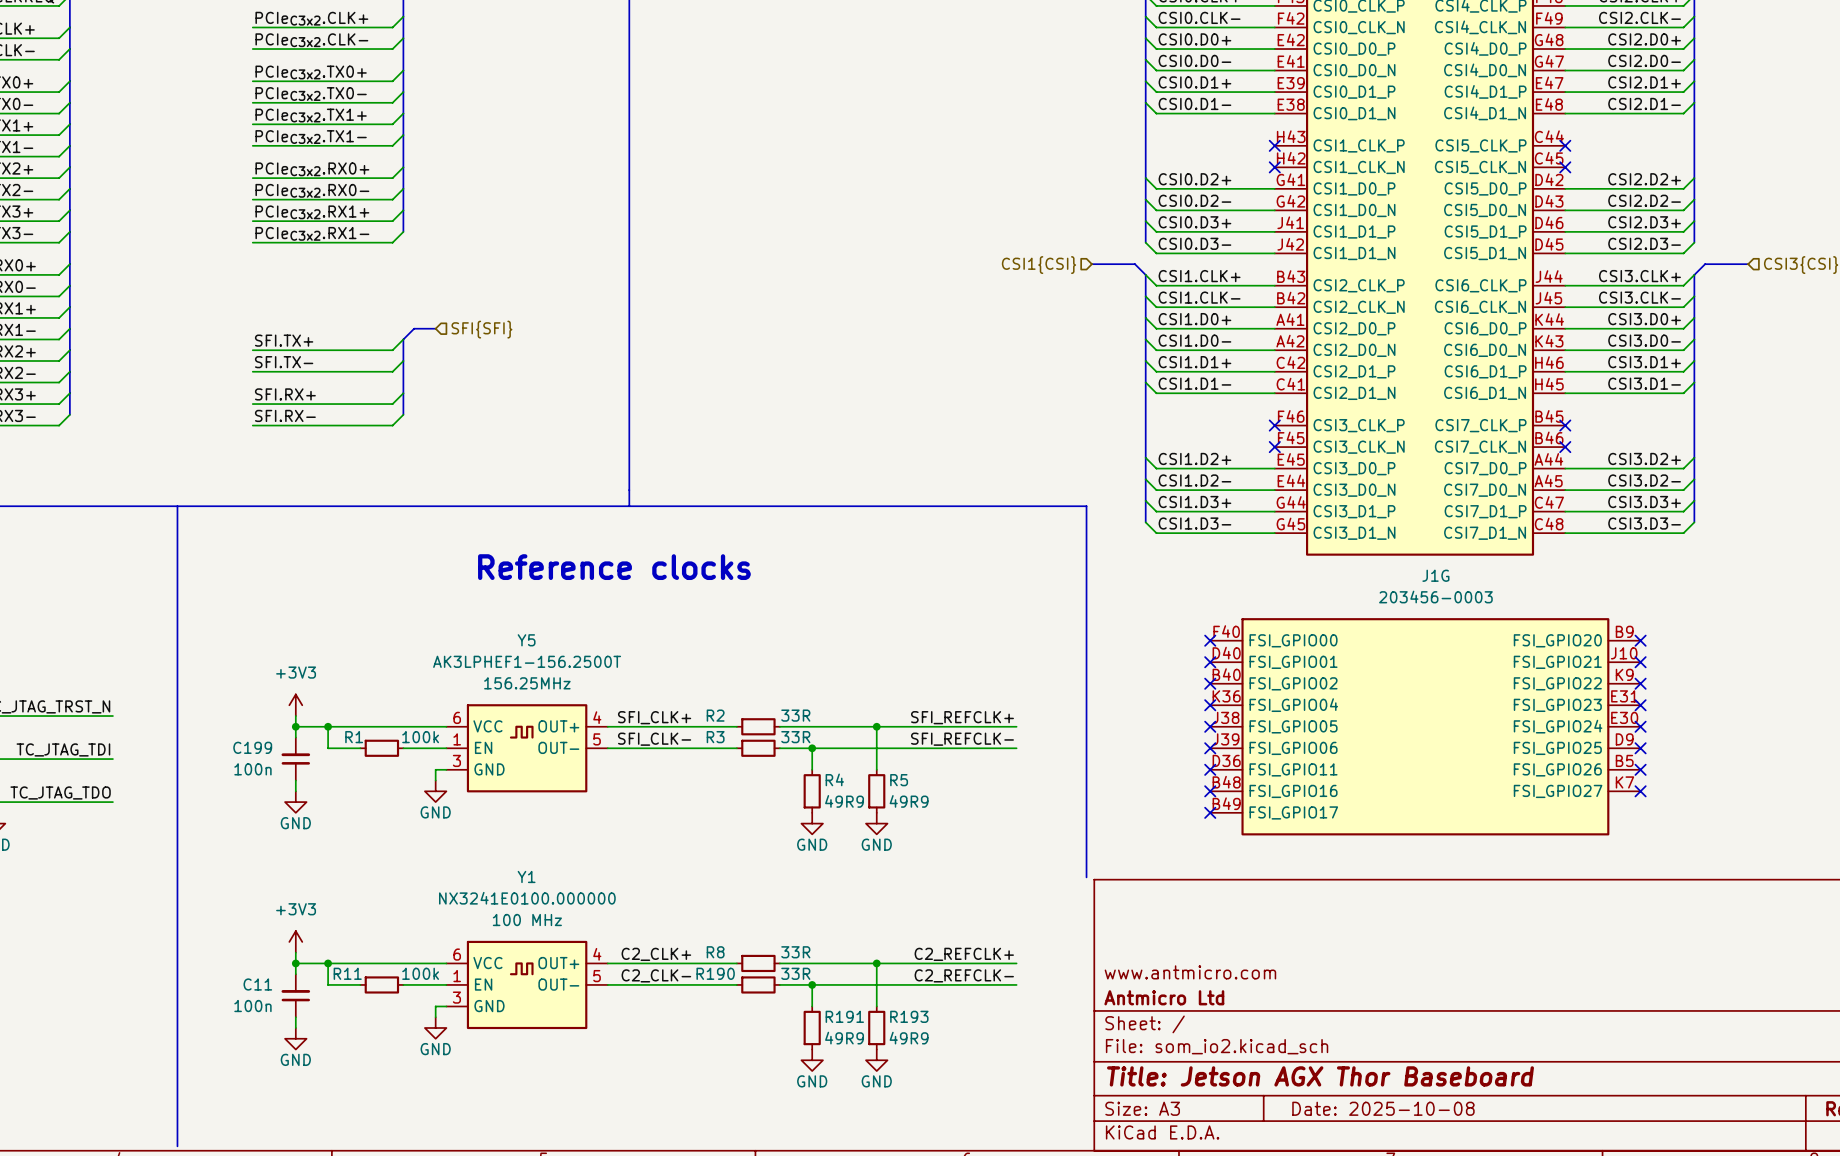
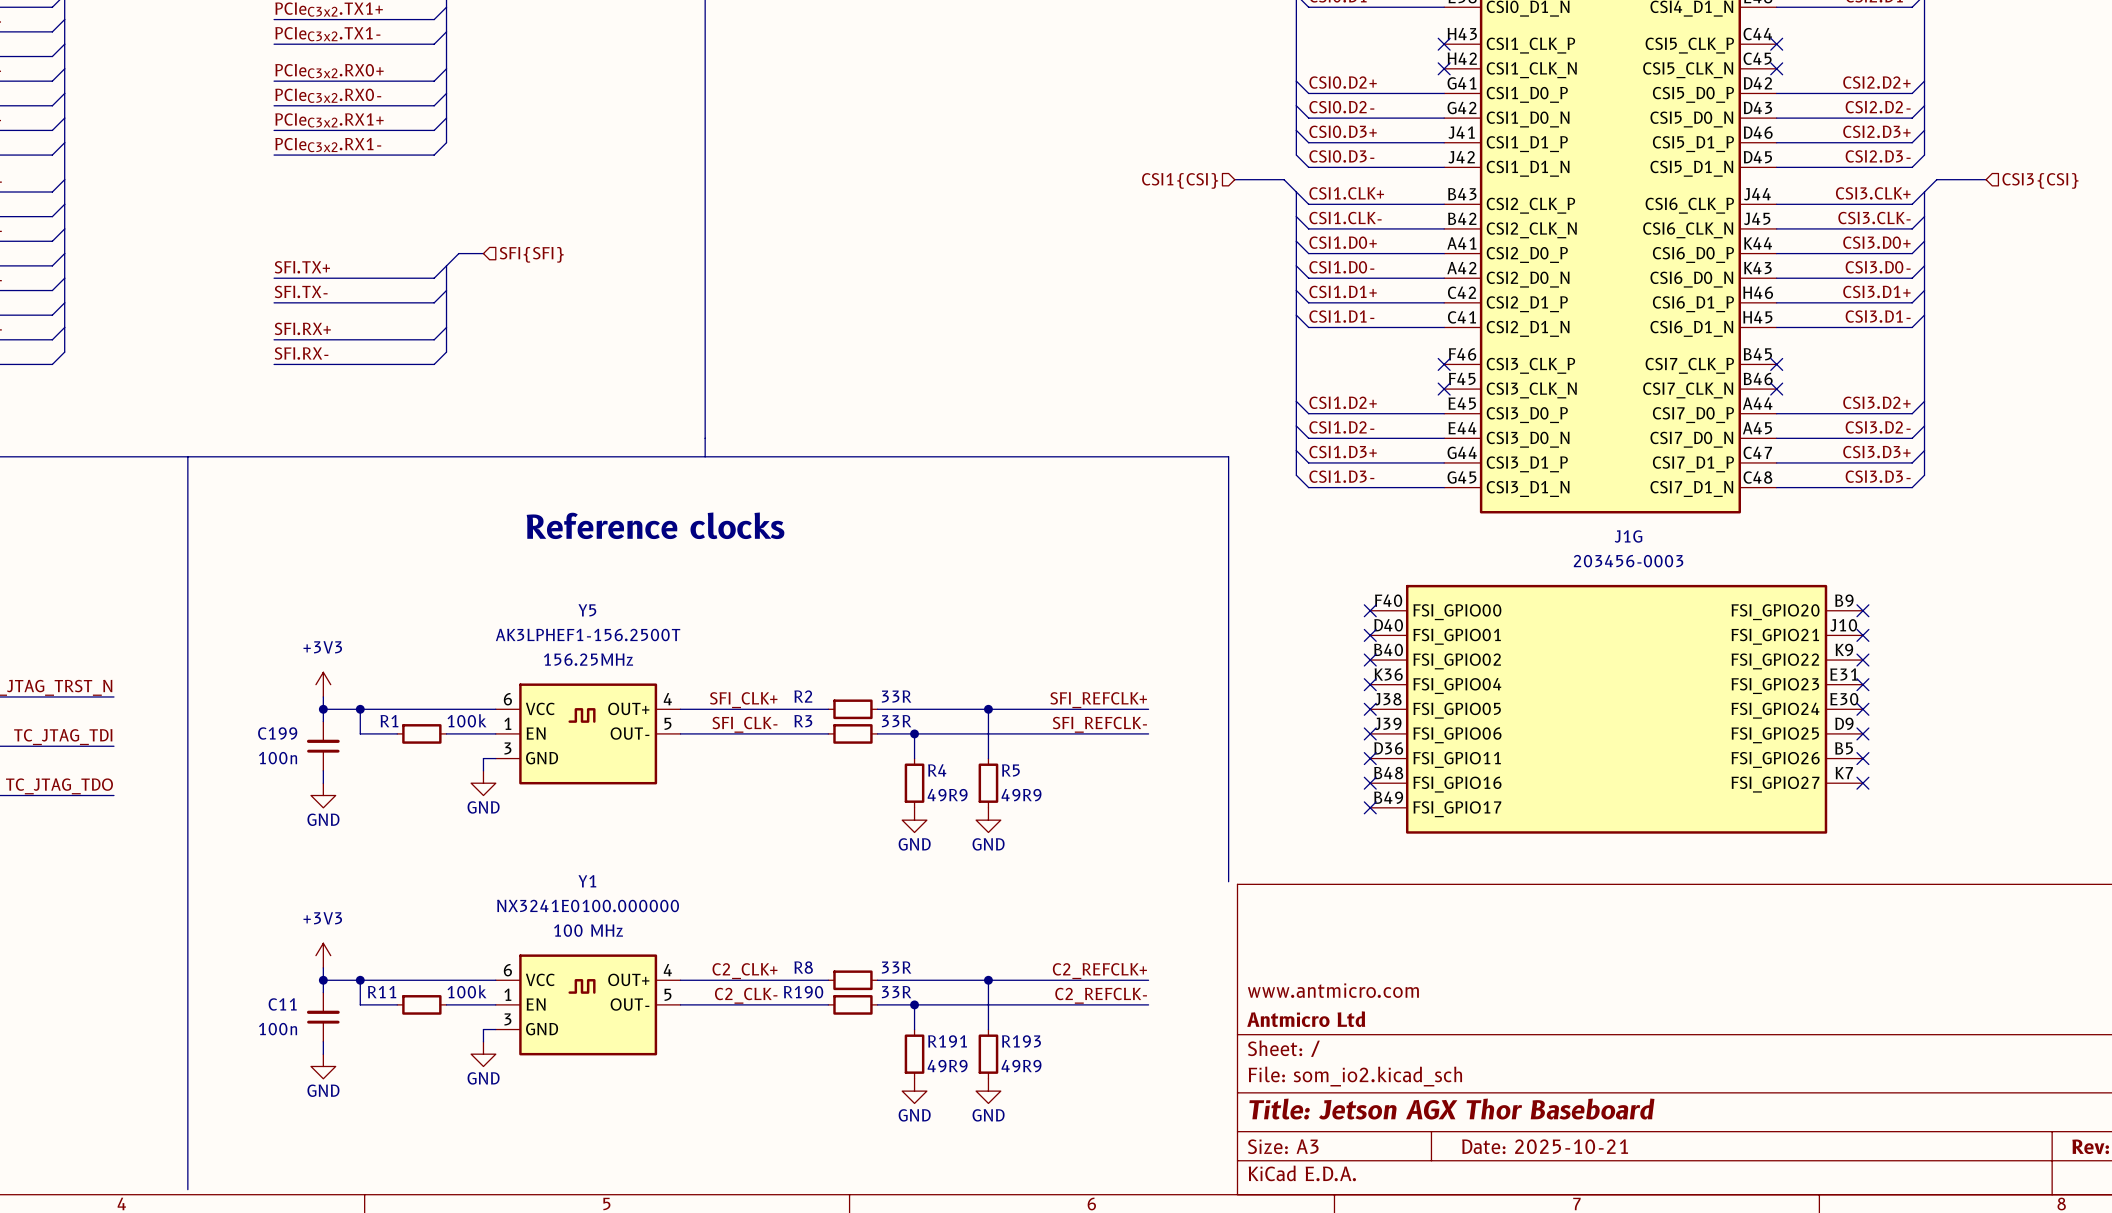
title block: Date: 2025-10-08 (1383, 1108) -> Date: 2025-10-21 (1545, 1146)

